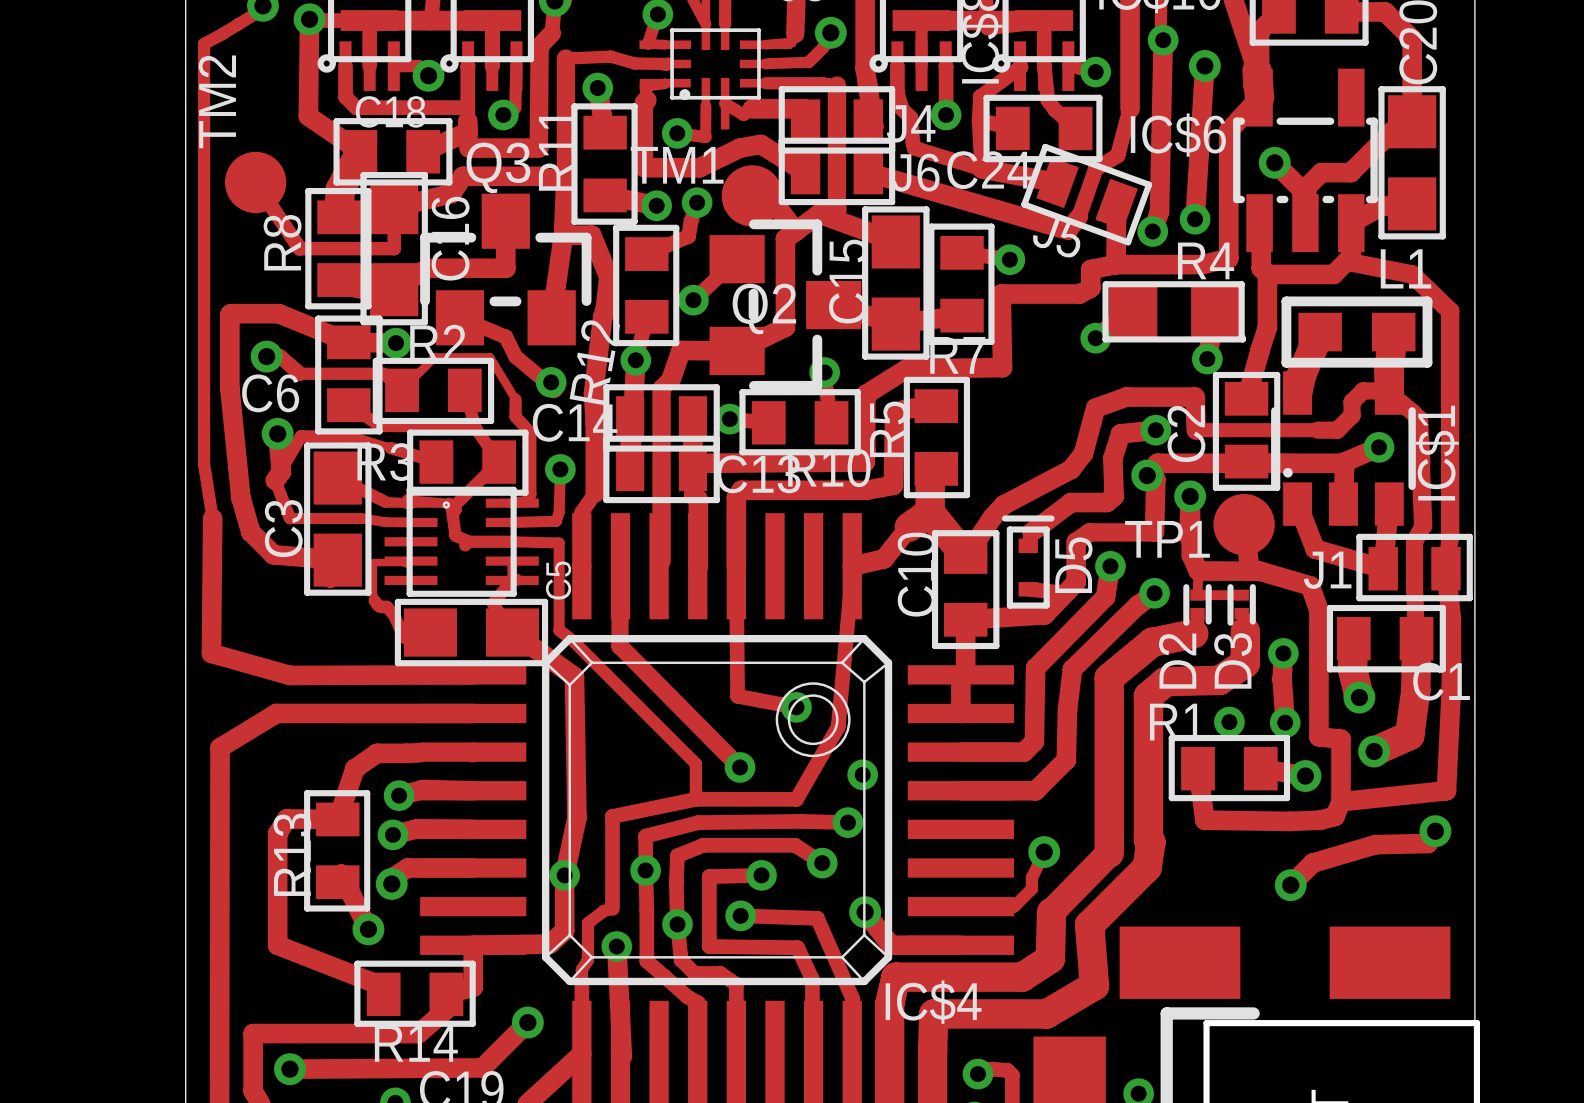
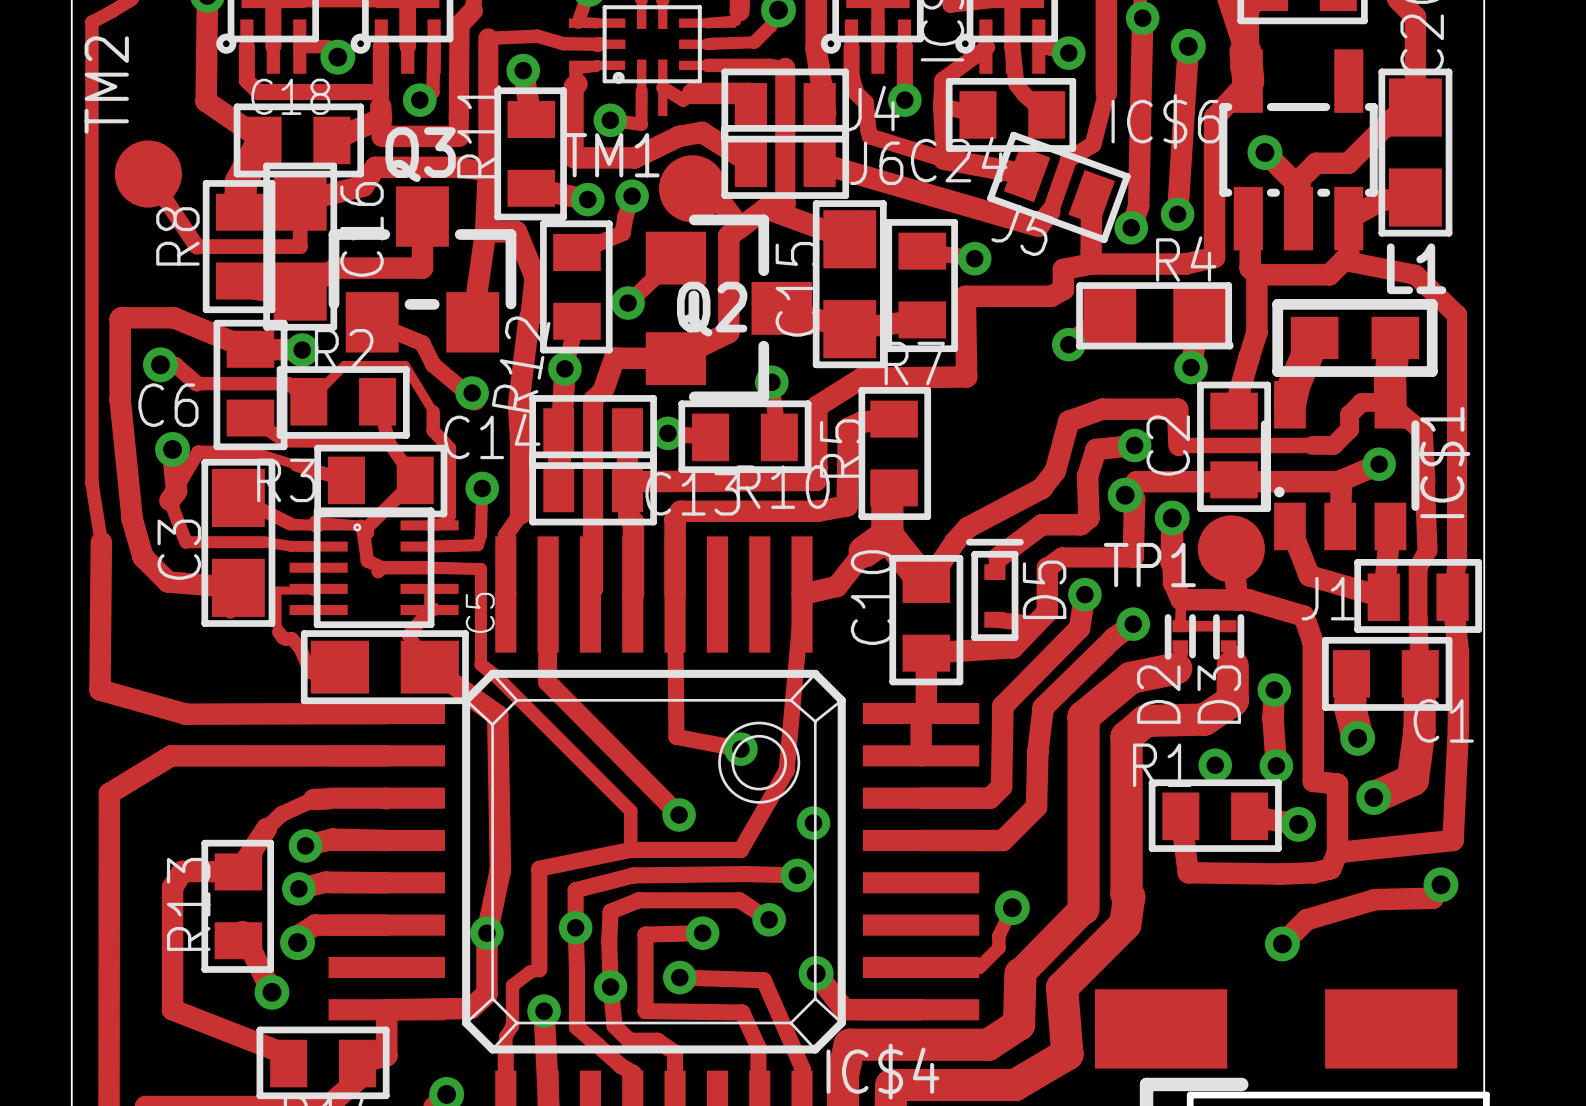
track: (406, 753) (377, 753) (354, 768) (337, 819) -> (313, 799) (281, 814) (266, 828) (238, 871)

